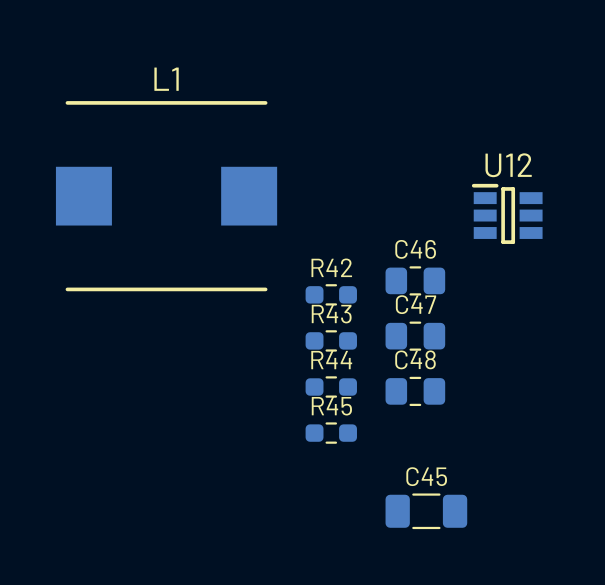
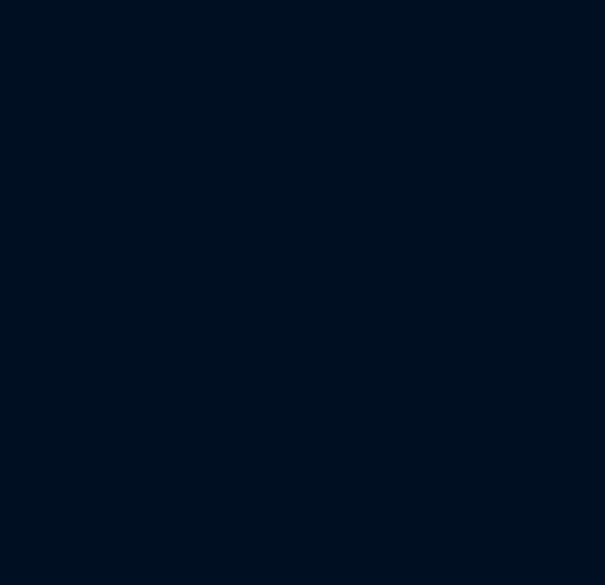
L1: (166, 196) -> none
U12: (507, 213) -> none
C46: (415, 280) -> none
R42: (331, 294) -> none
C47: (415, 336) -> none
R43: (331, 340) -> none
R44: (331, 387) -> none
C48: (415, 391) -> none
R45: (331, 433) -> none
C45: (426, 511) -> none

